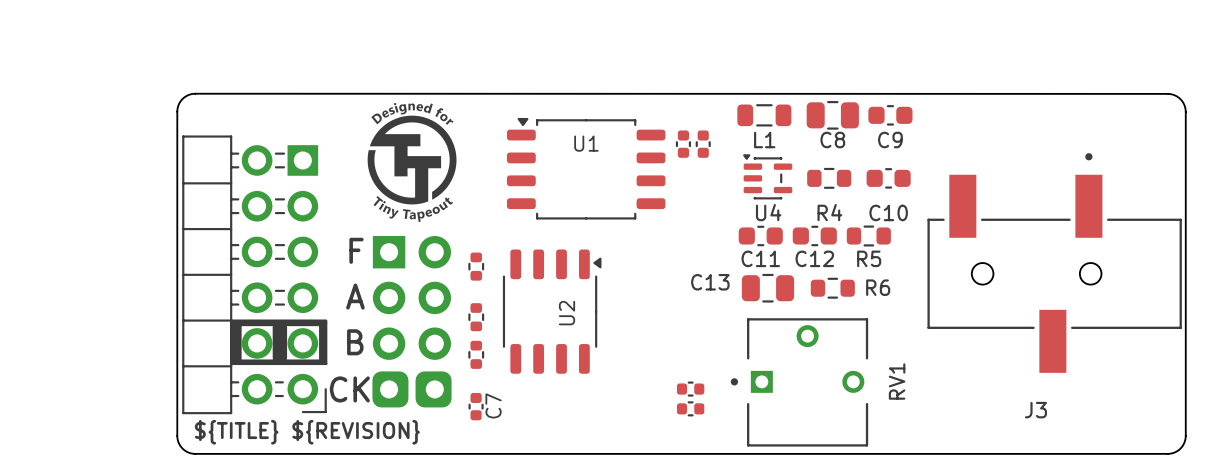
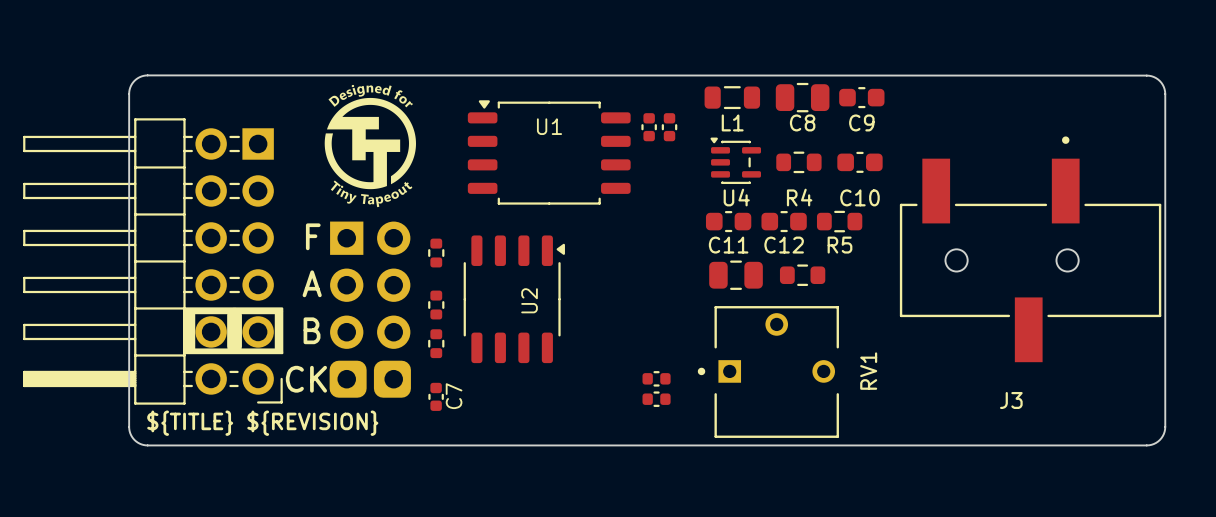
part: none -> (153, 261)
part: (254, 274) -> none
C13 name: C13 (710, 282) -> none
R6 name: R6 (878, 287) -> none

